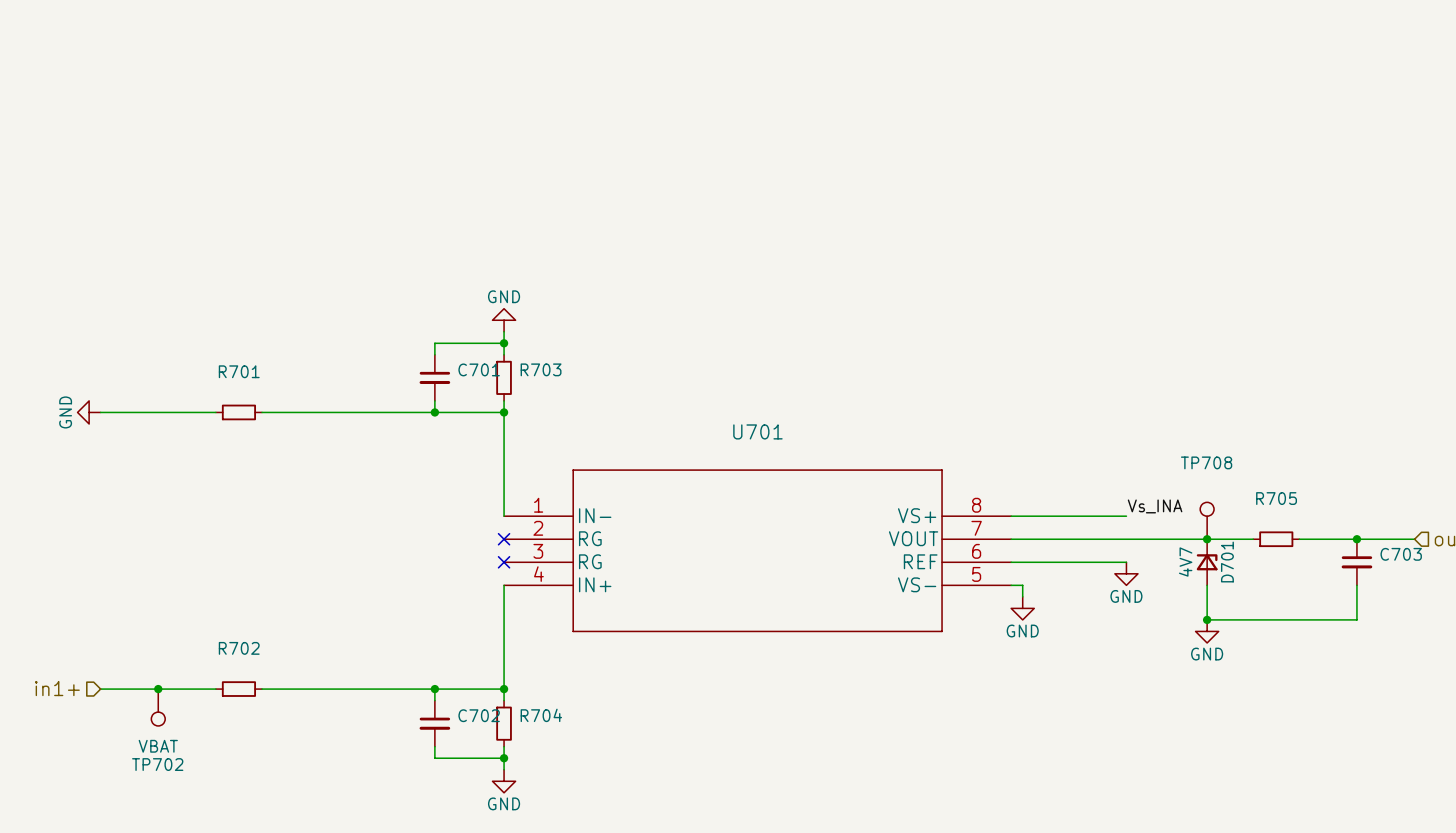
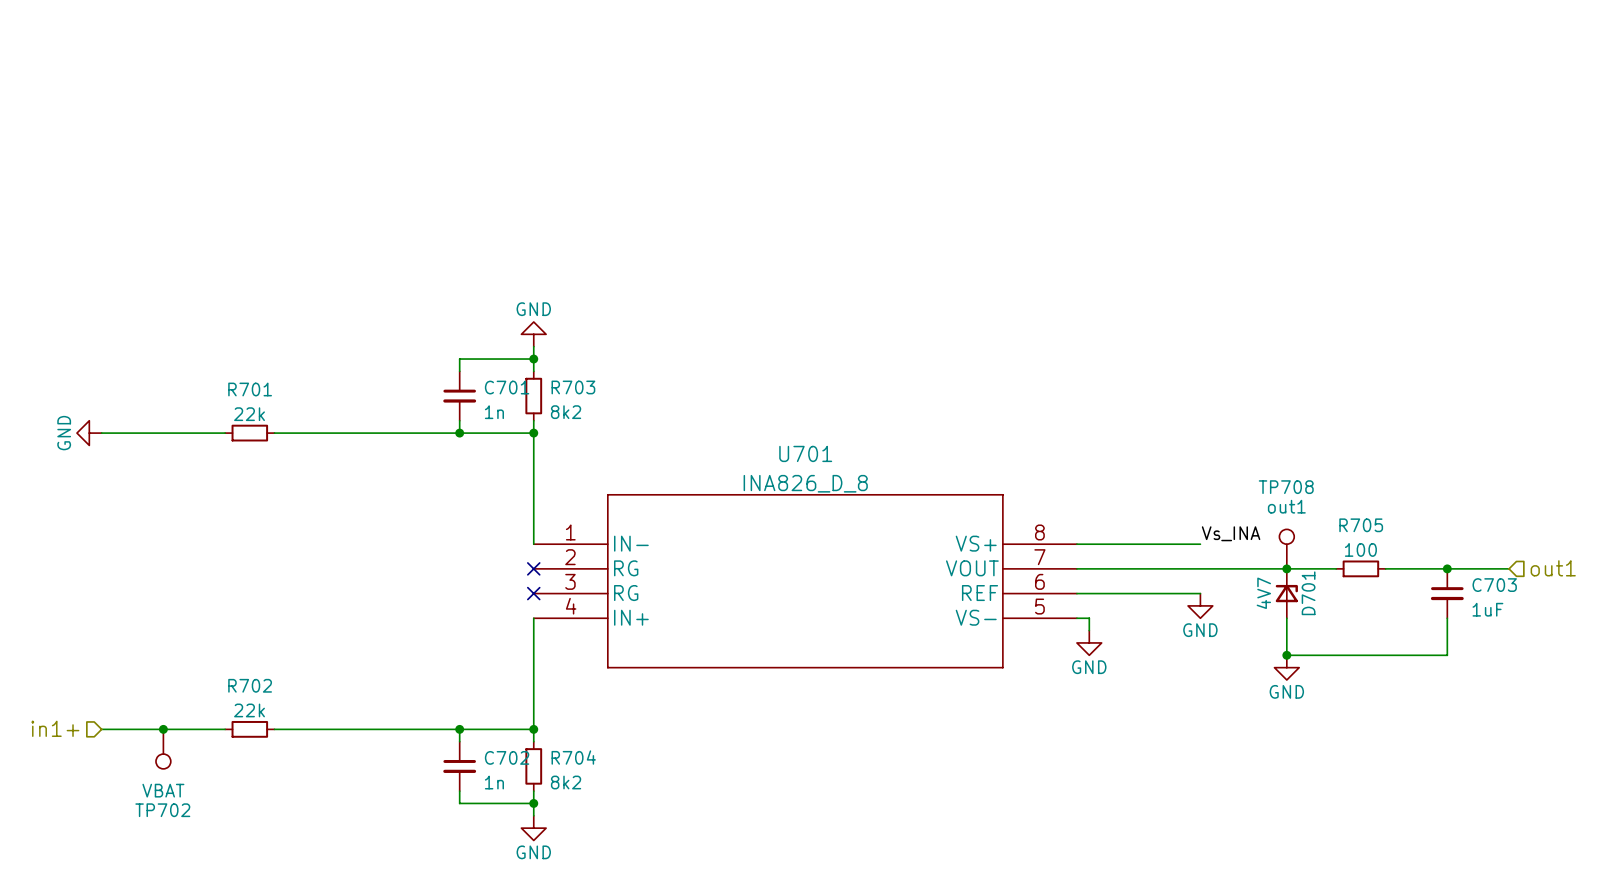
C701 value: none -> 1n (494, 412)
R703 value: none -> 8k2 (566, 412)
R701 value: none -> 22k (249, 414)
U701 value: none -> INA826_D_8 (805, 483)
TP708 value: none -> out1 (1286, 506)
R705 value: none -> 100 (1360, 549)
C703 value: none -> 1uF (1487, 609)
R702 value: none -> 22k (249, 710)
C702 value: none -> 1n (494, 782)
R704 value: none -> 8k2 (566, 782)

